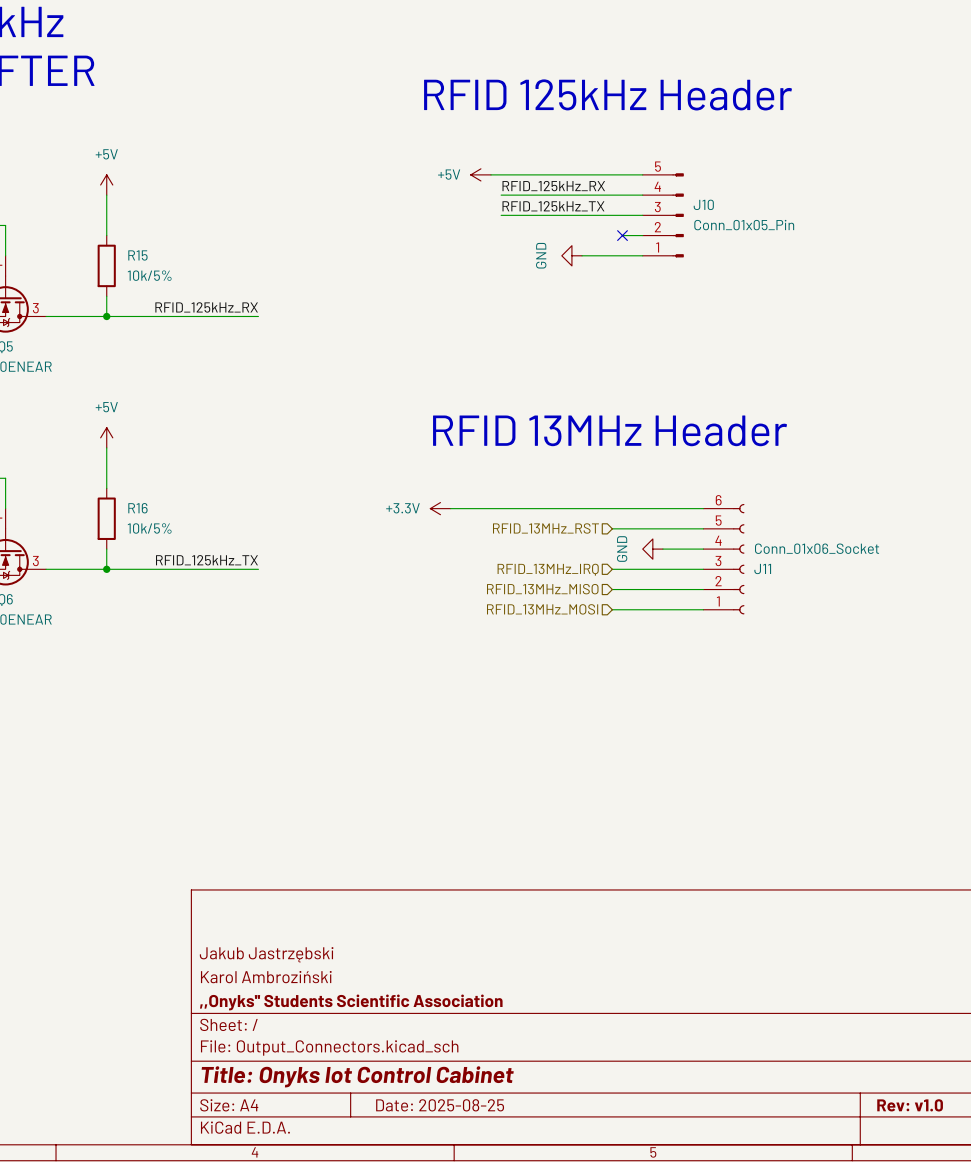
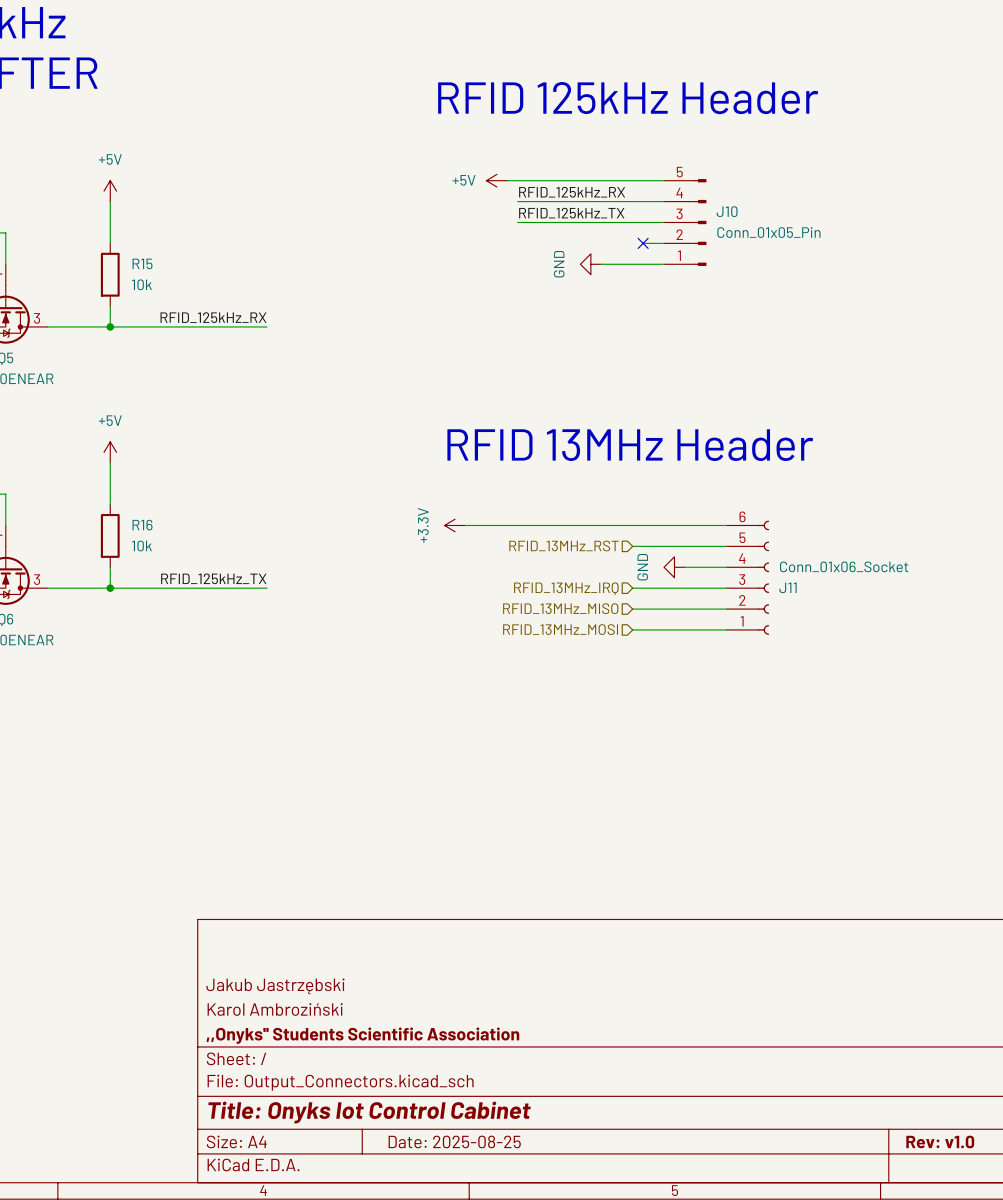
R15 value: 10k/5% (149, 275) -> 10k (141, 284)
power symbol text rotation: 0° (402, 508) -> 90° counterclockwise (423, 525)
R16 value: 10k/5% (149, 528) -> 10k (141, 545)

